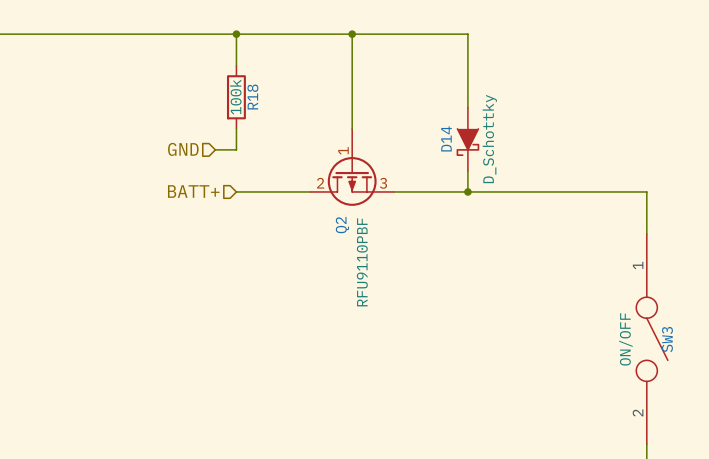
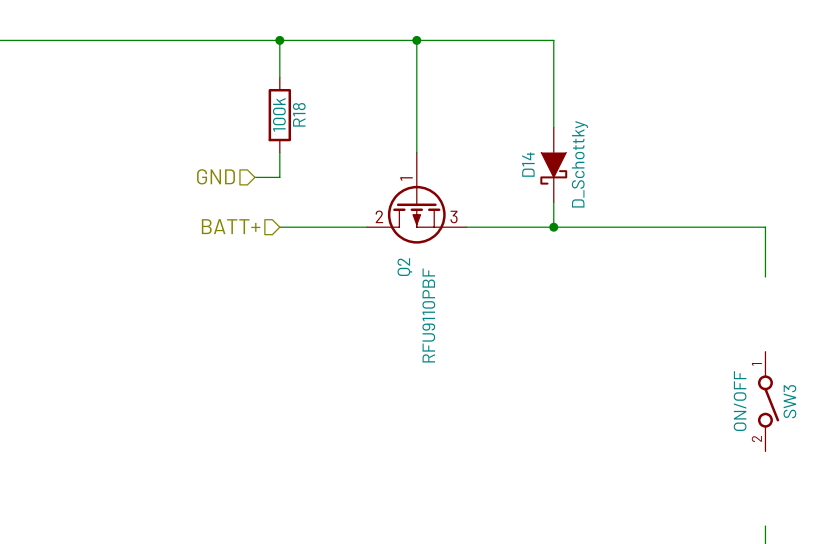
SW3 symbol: [636, 234, 668, 445] -> [757, 351, 780, 452]

